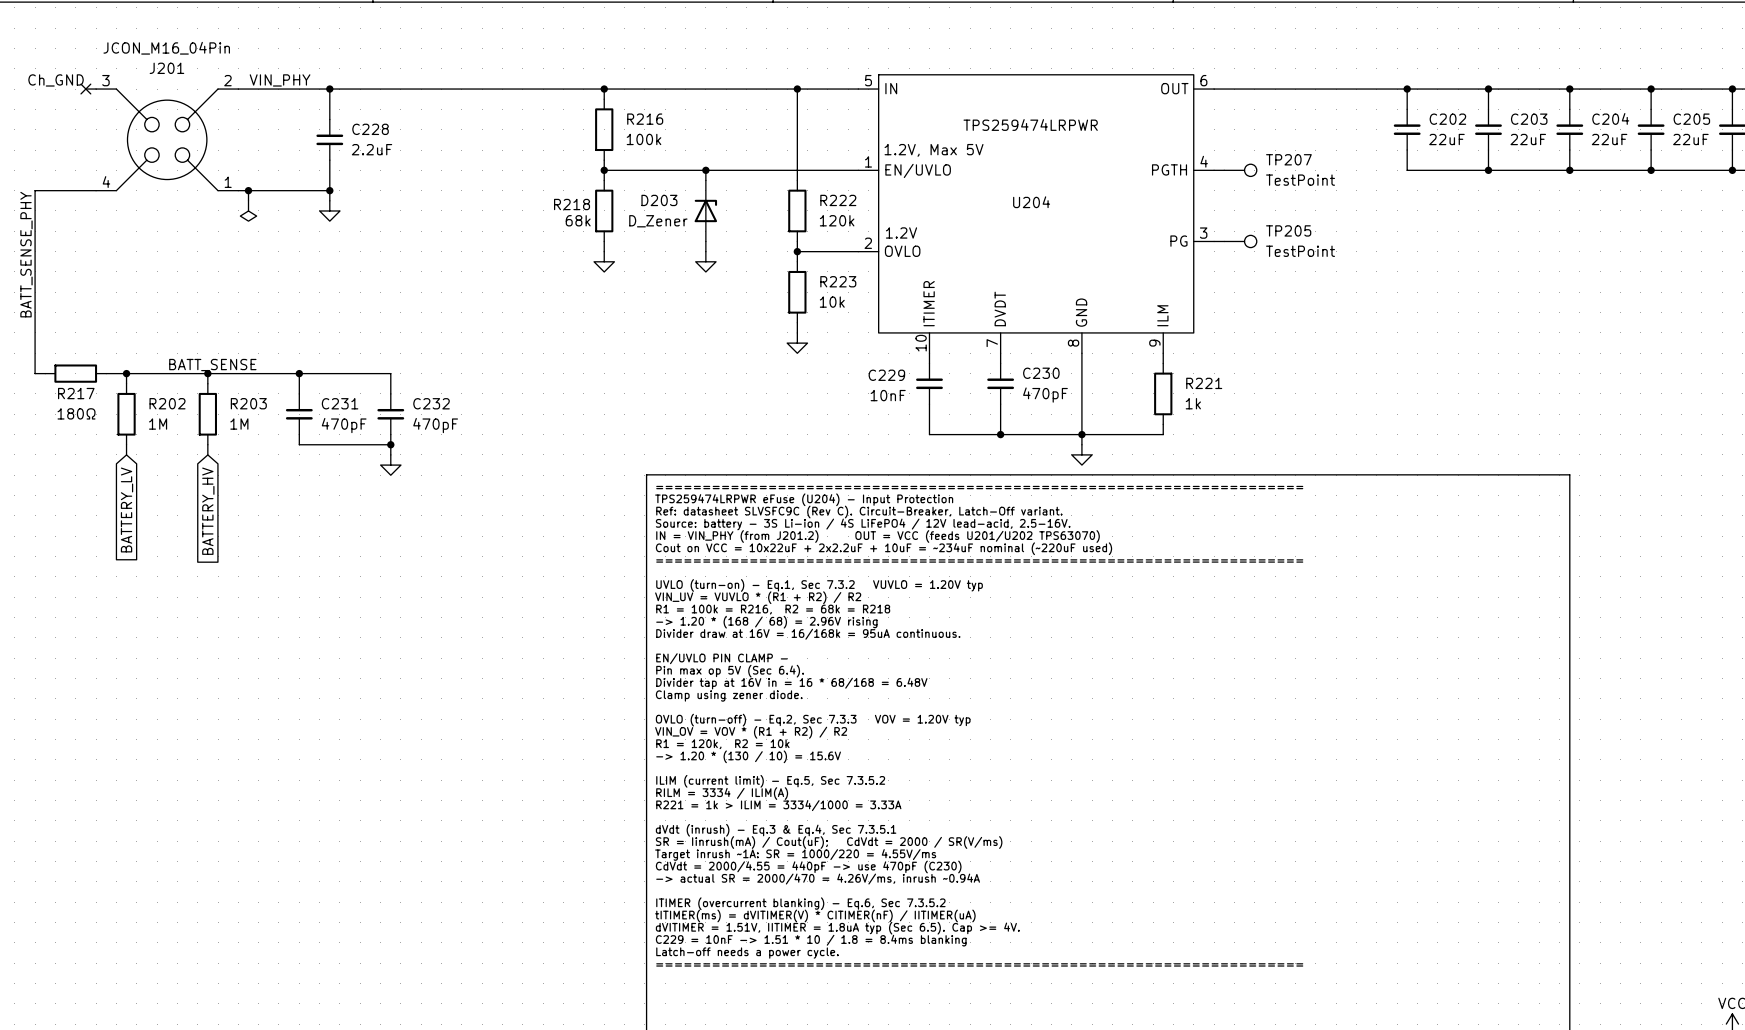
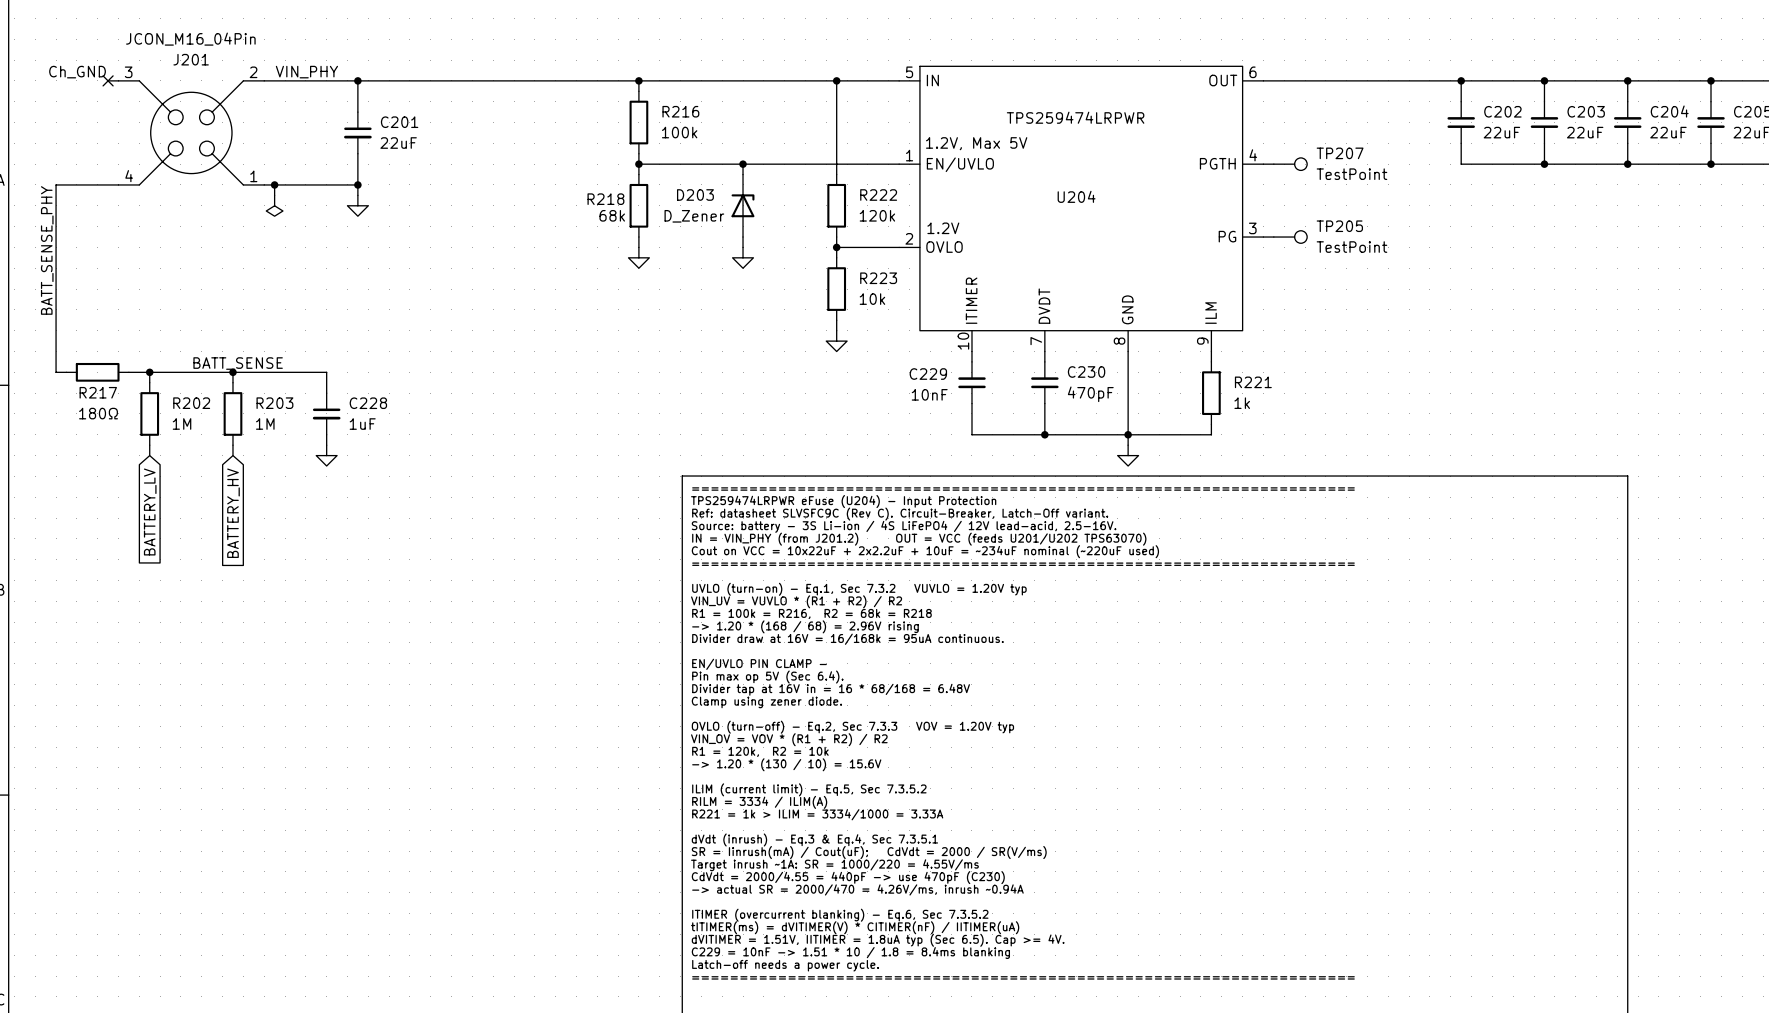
C228 symbol: [316, 119, 344, 161] -> [312, 393, 341, 435]
C201: none -> 22uF (357, 132)
C228 value: 2.2uF (371, 149) -> 1uF (362, 424)
wire: (299, 373) (390, 373) (390, 393) -> none
junction: (299, 373) -> none
C231: 470pF (299, 414) -> none
C232: 470pF (390, 414) -> none
wire: (390, 434) (390, 454) -> none
wire: (299, 444) (390, 444) -> none
junction: (390, 444) -> none
power symbol position: (390, 465) -> (326, 455)

